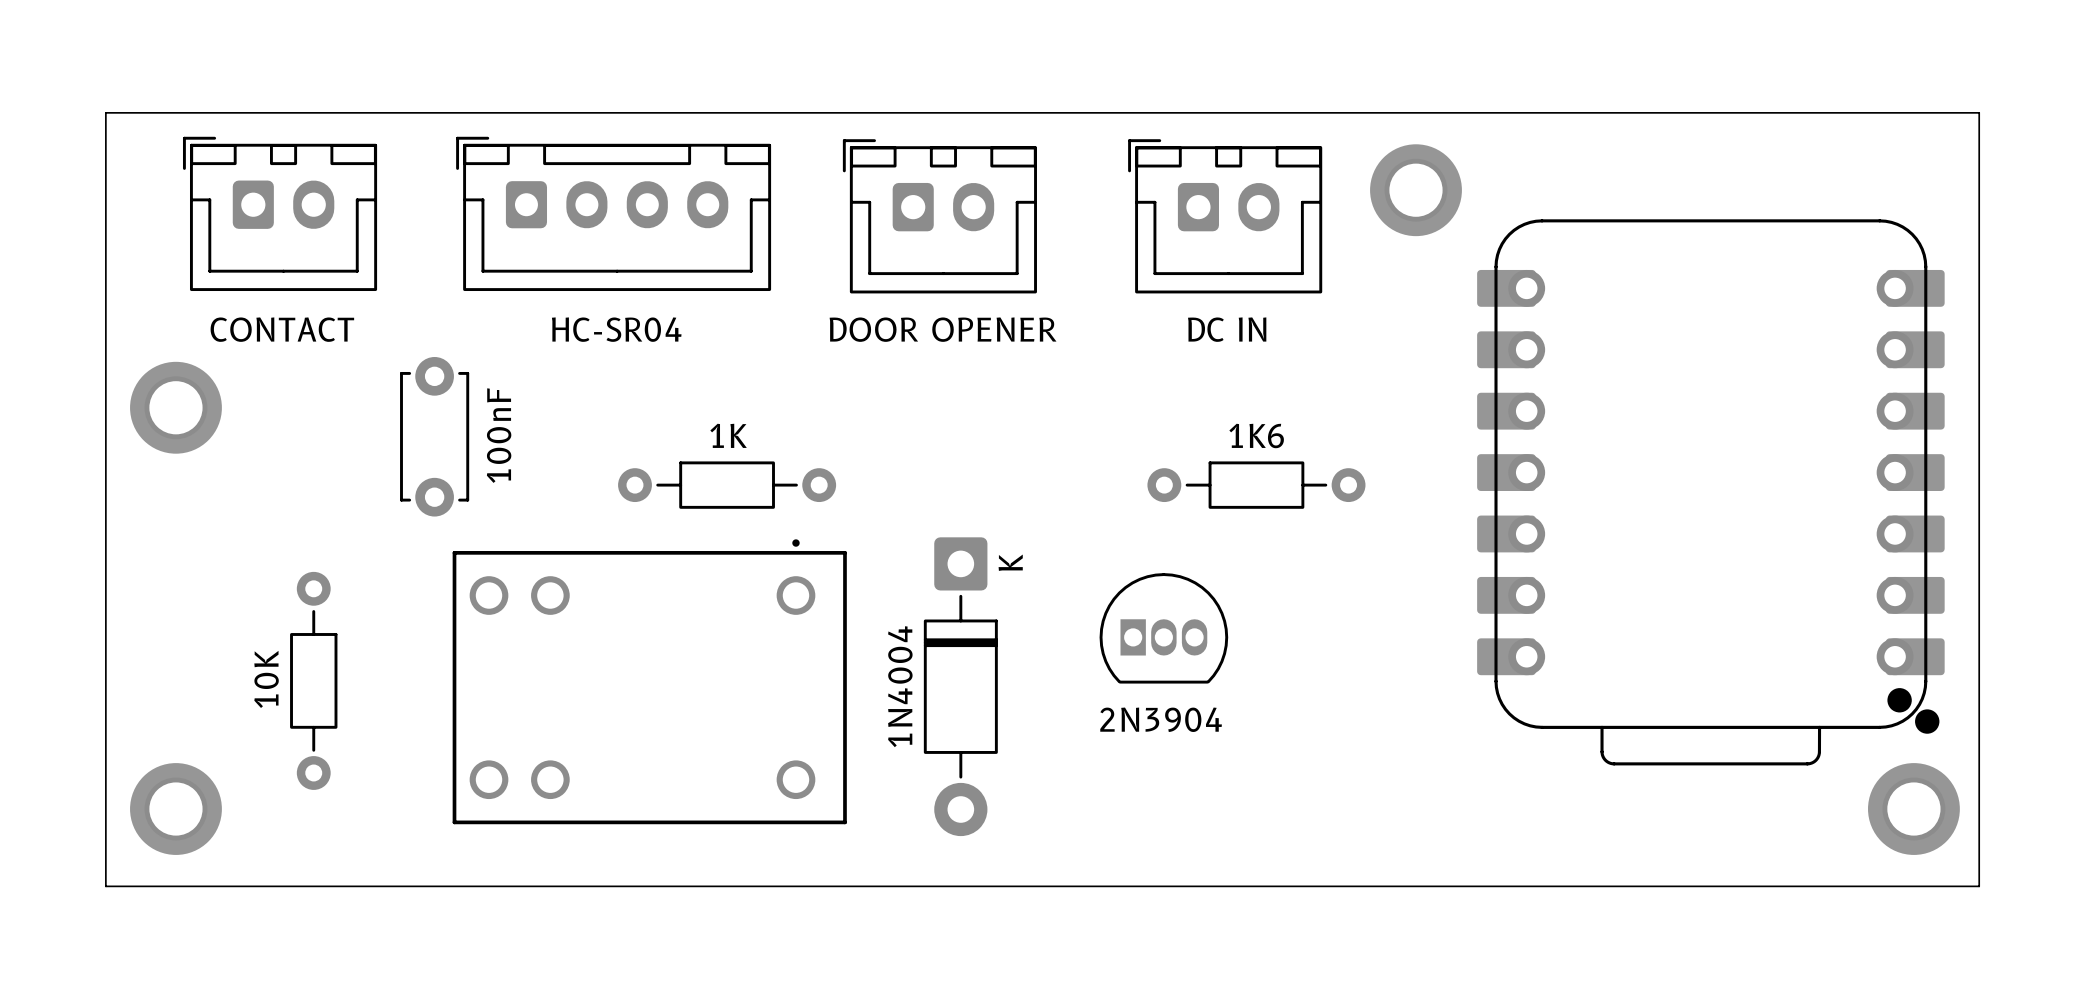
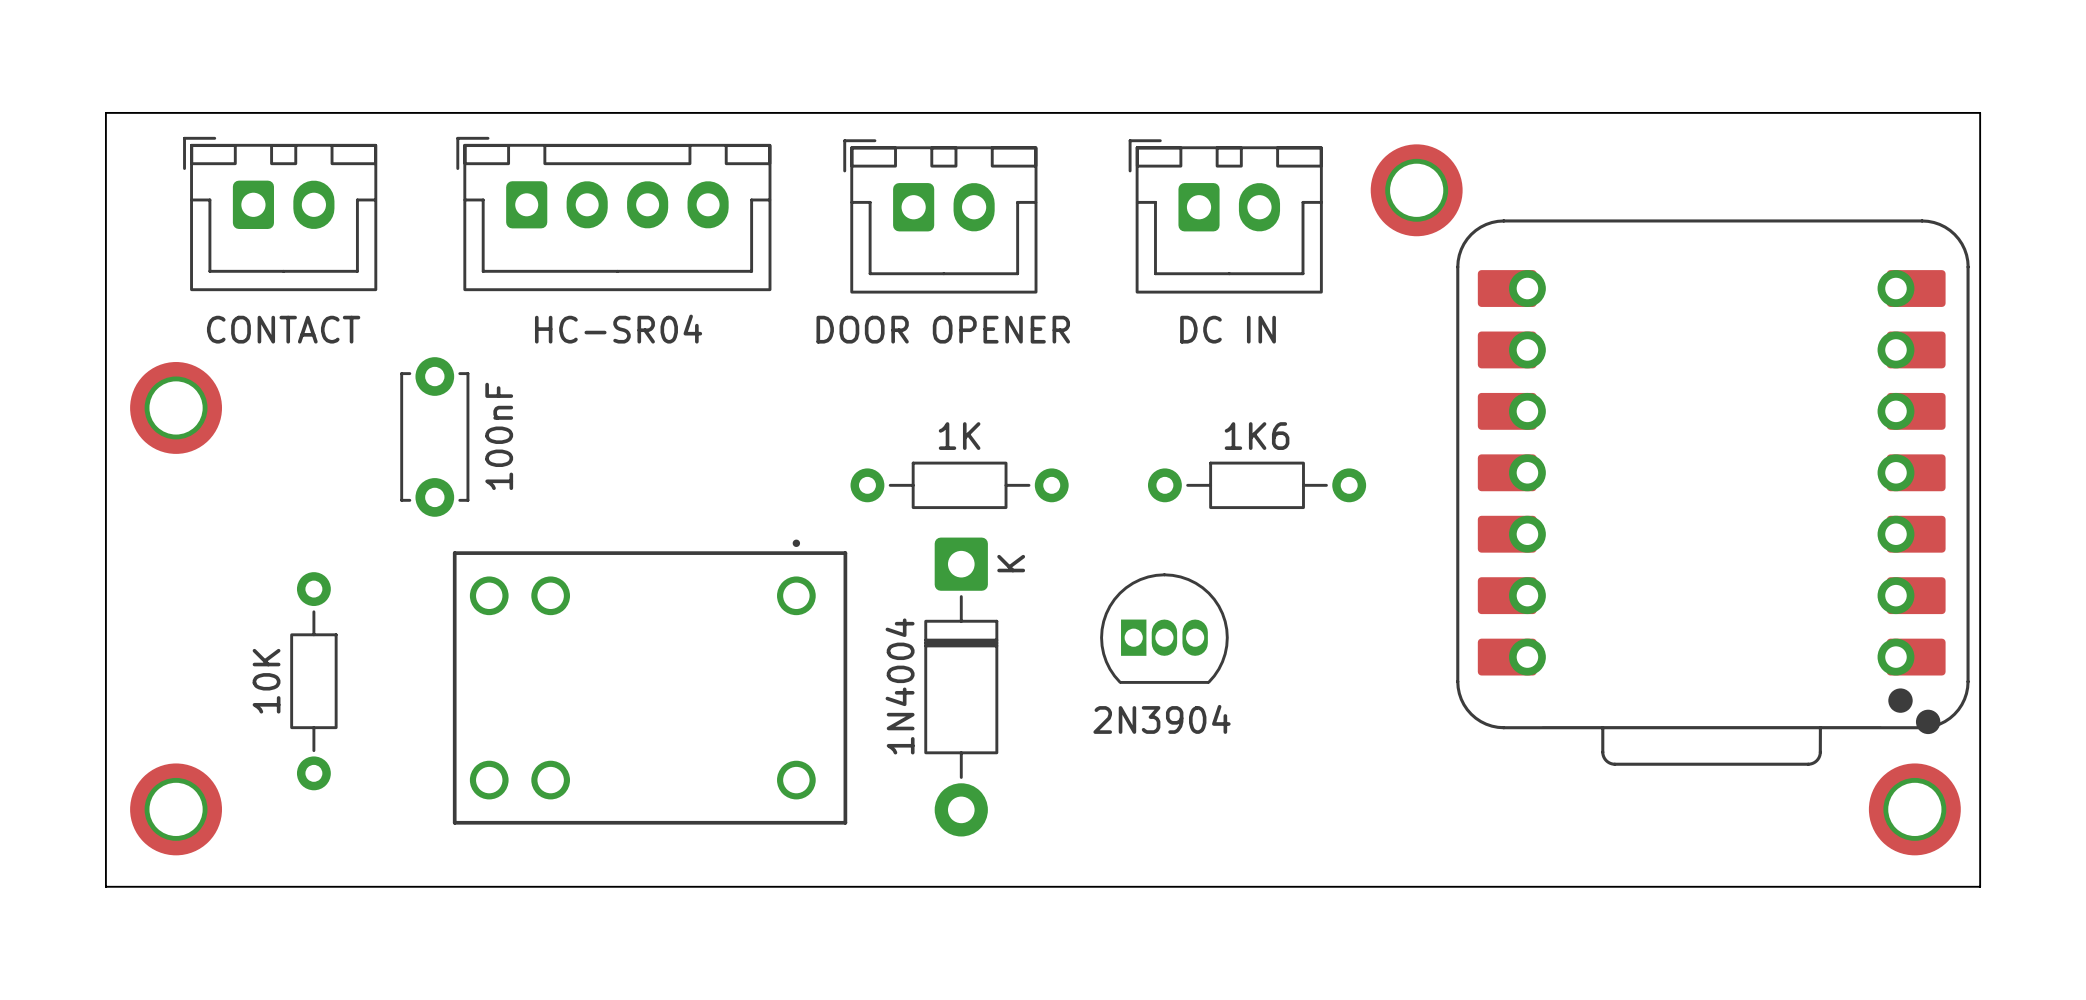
part footprint: [1477, 219, 1945, 766] -> [1456, 219, 1970, 766]
part position: (727, 485) -> (959, 485)

